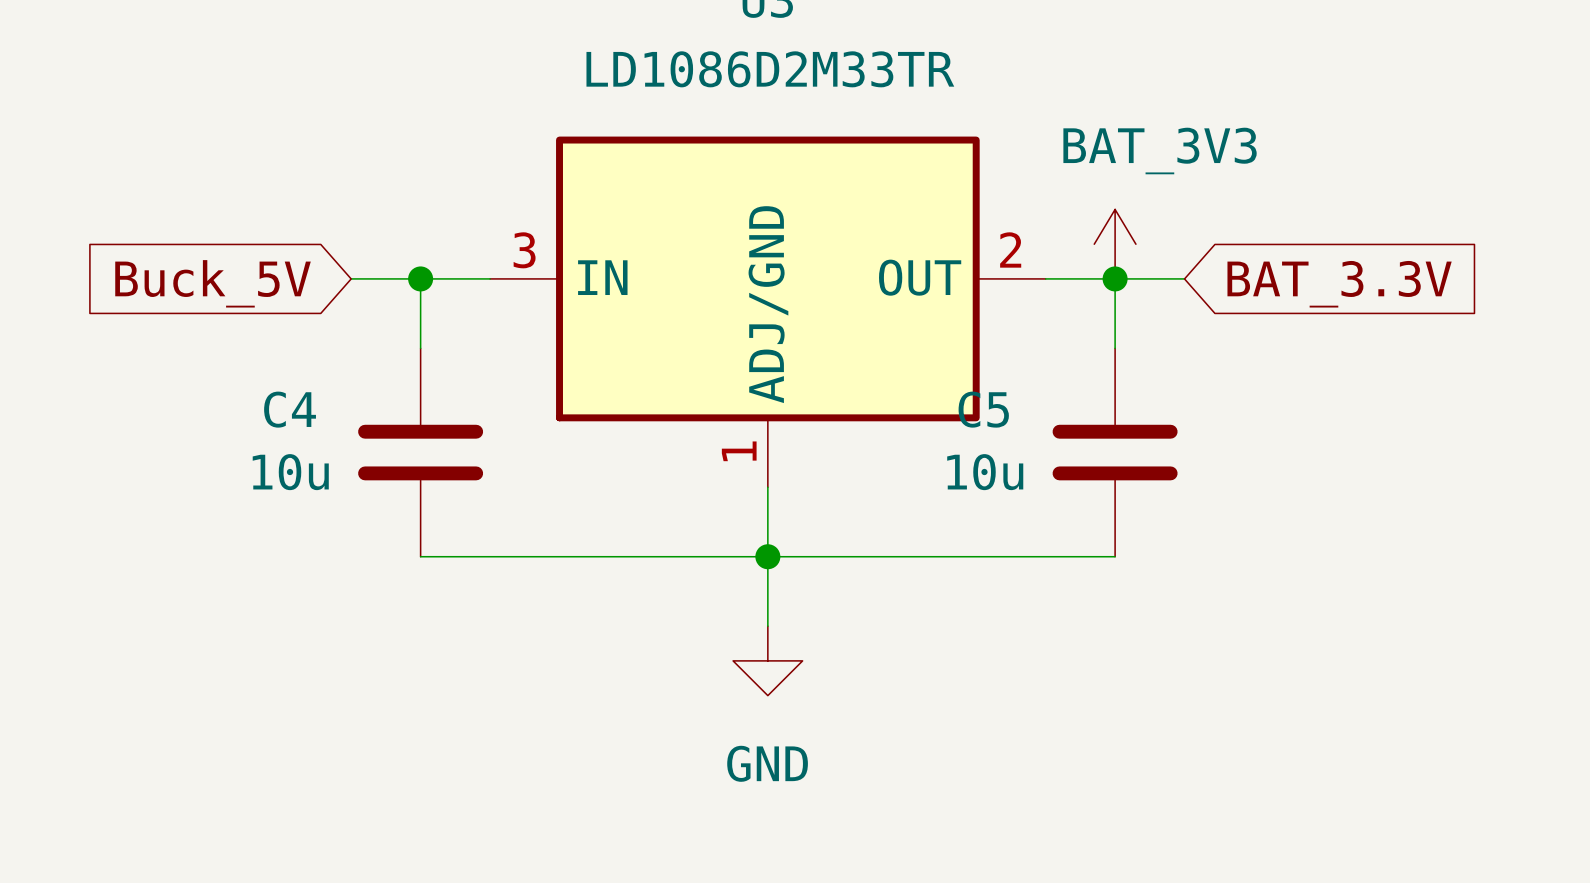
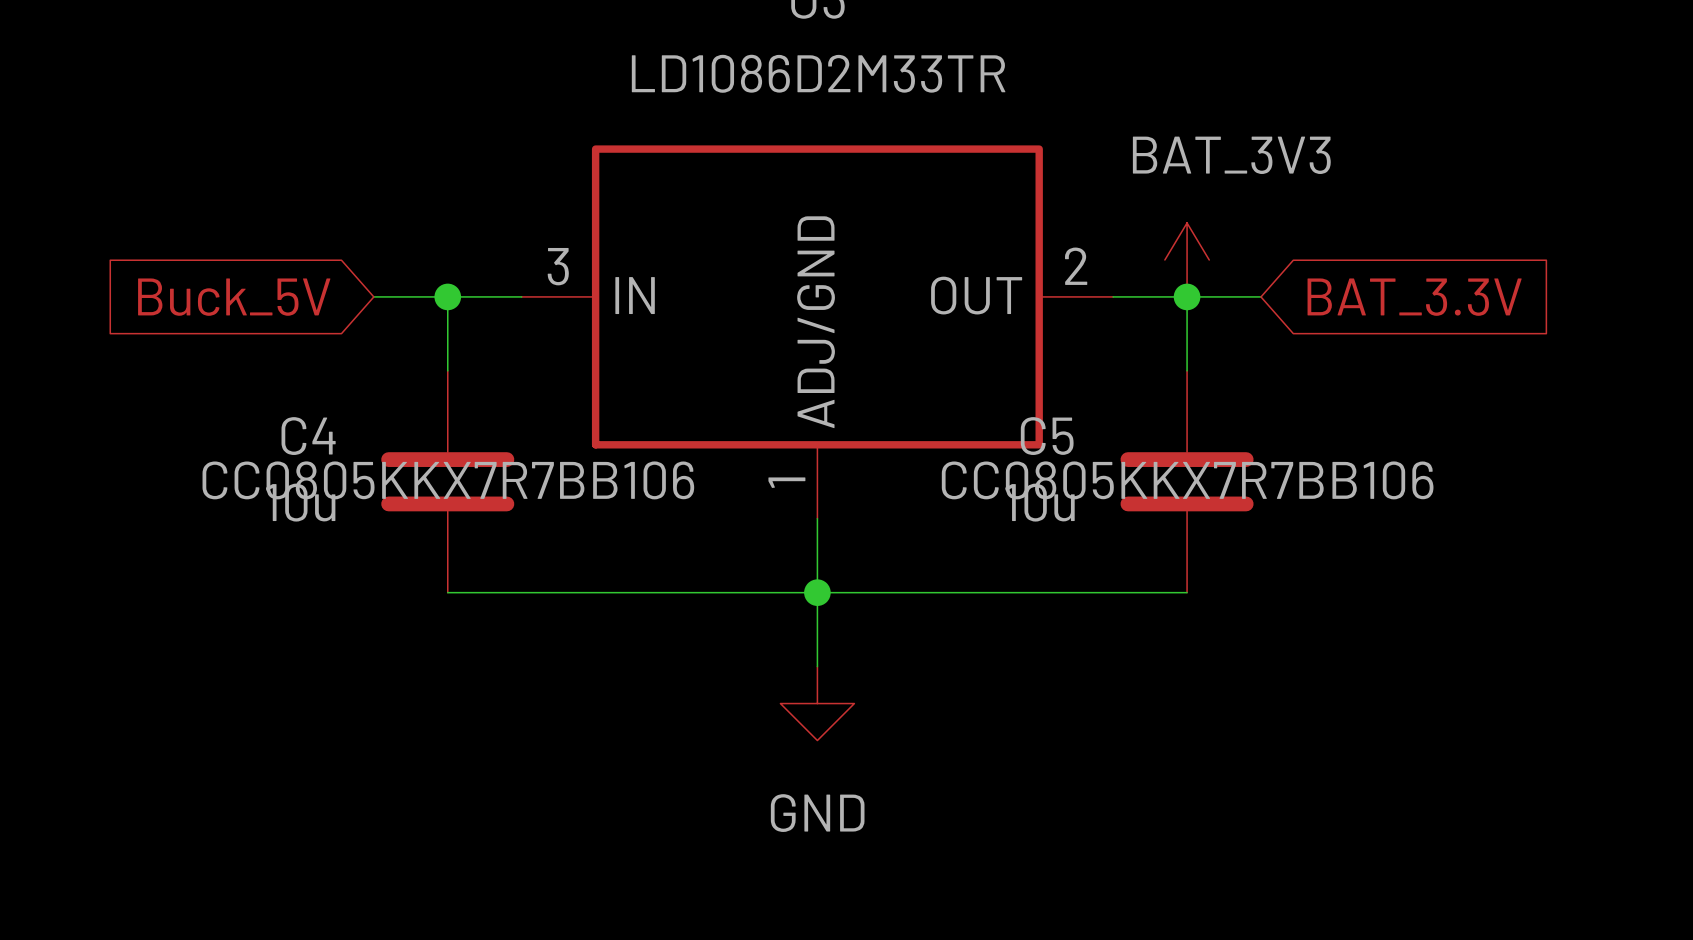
C4 text: none -> CC0805KKX7R7BB106 (448, 480)
C5 text: none -> CC0805KKX7R7BB106 (1187, 480)

